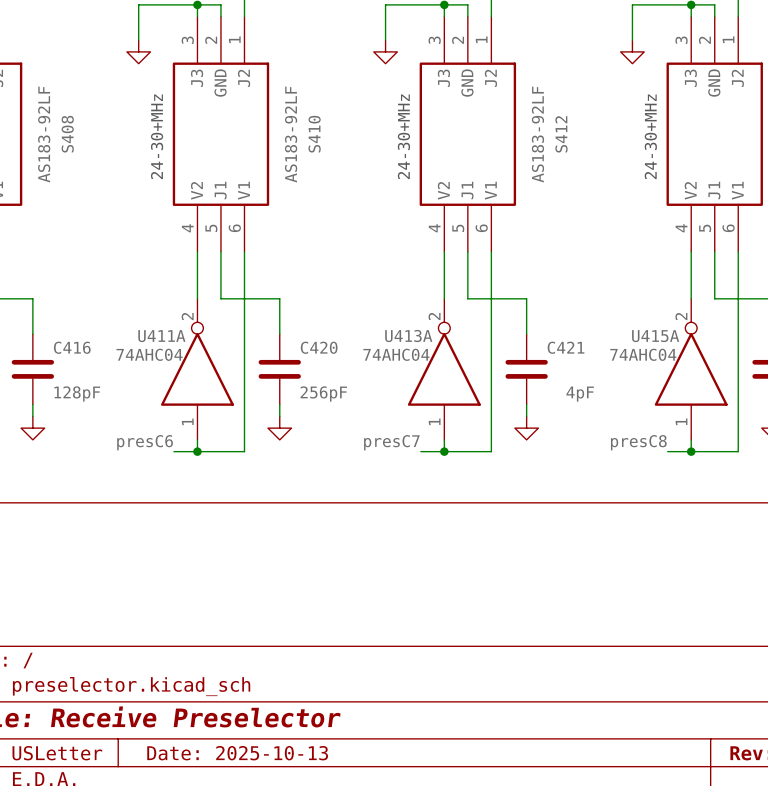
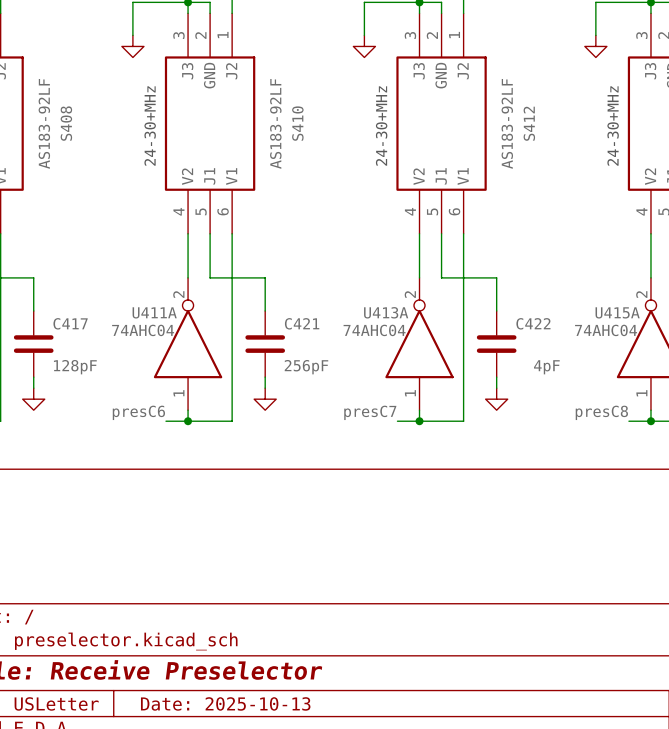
C416 name: C416 (72, 347) -> C417 (70, 323)
C420 name: C420 (319, 347) -> C421 (302, 323)
C421 name: C421 (566, 347) -> C422 (533, 323)

